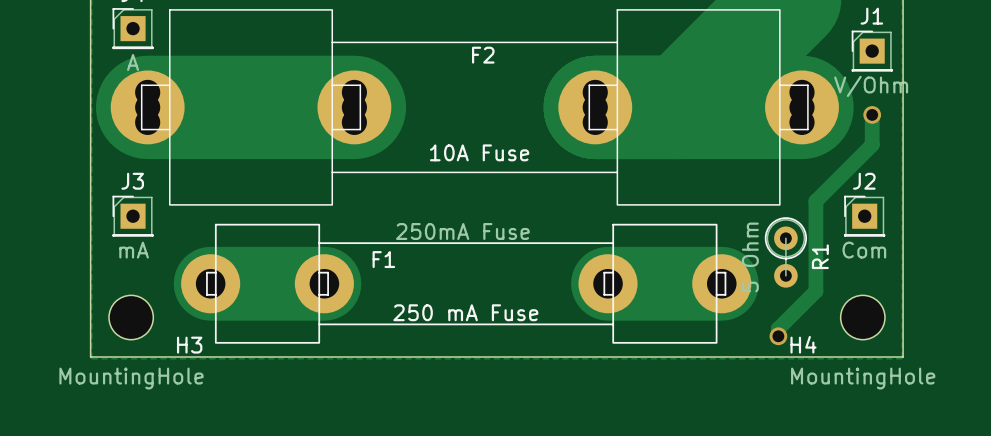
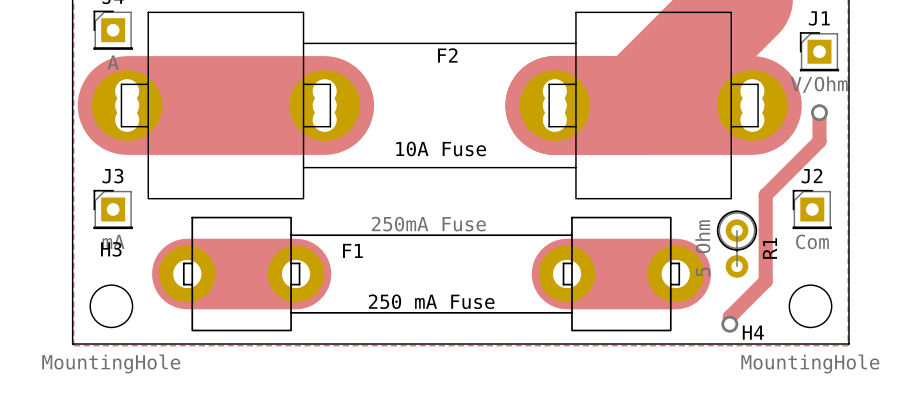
H3 name position: H3 (189, 345) -> H3 (111, 249)

